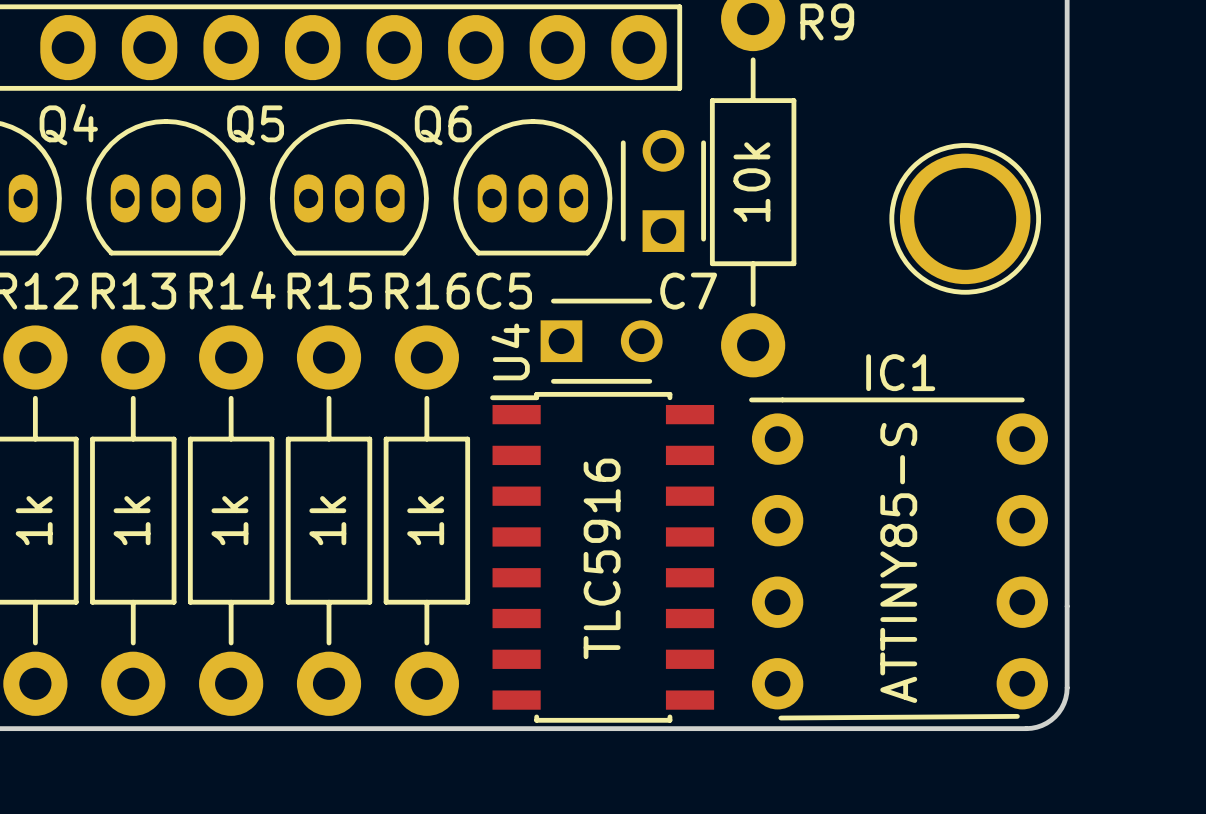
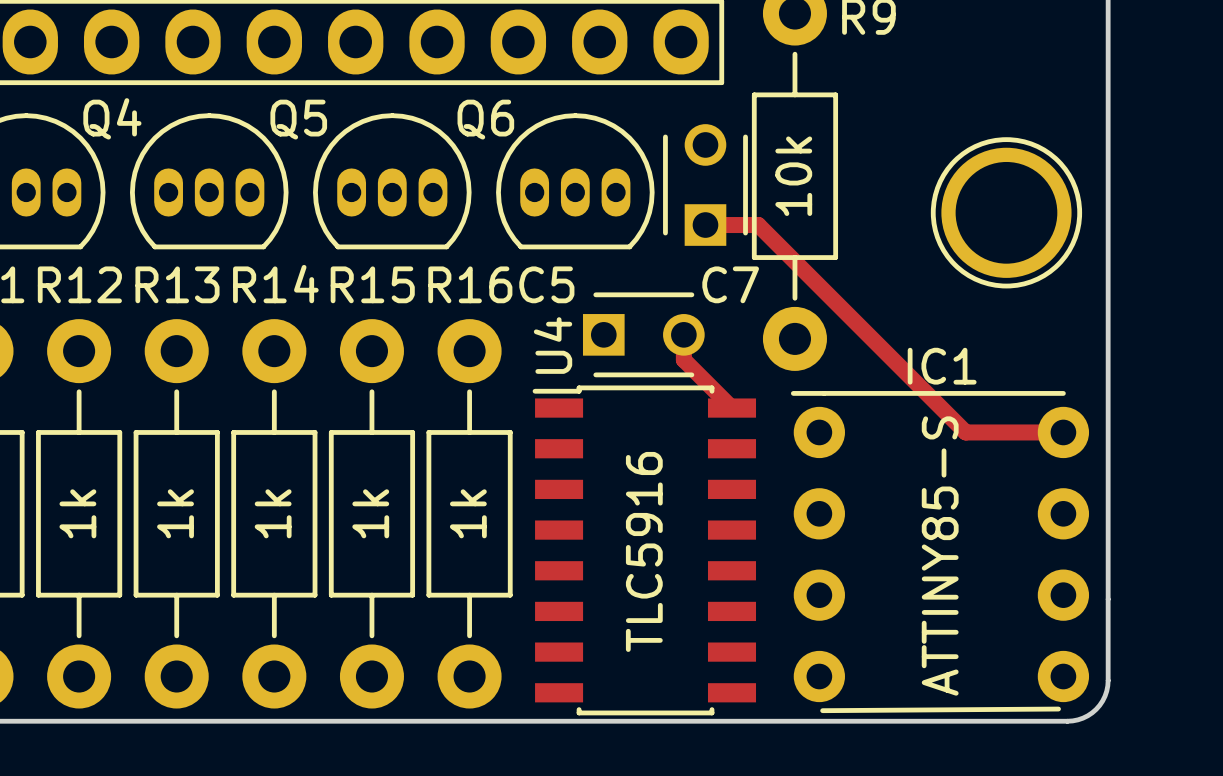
track: none -> (705, 225) (758, 225) (965, 432) (1063, 432)
track: none -> (683, 334) (683, 359) (732, 408)

